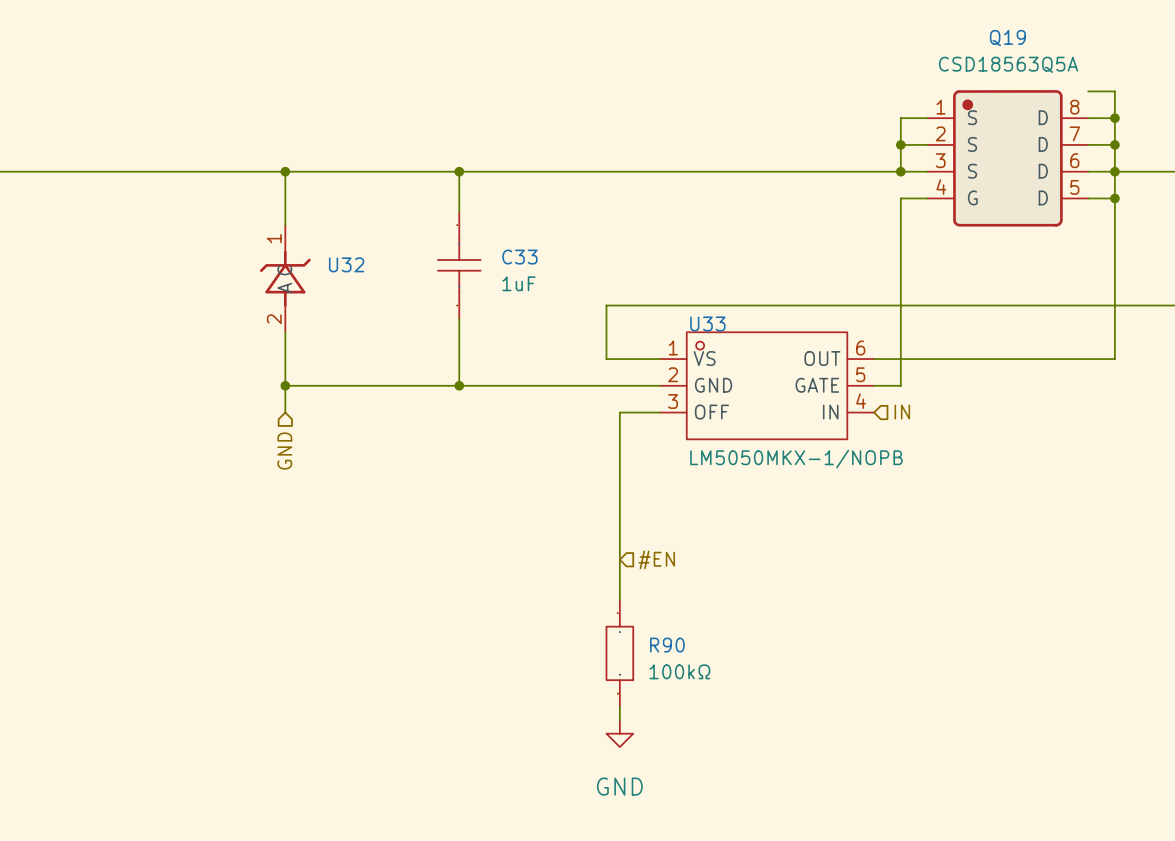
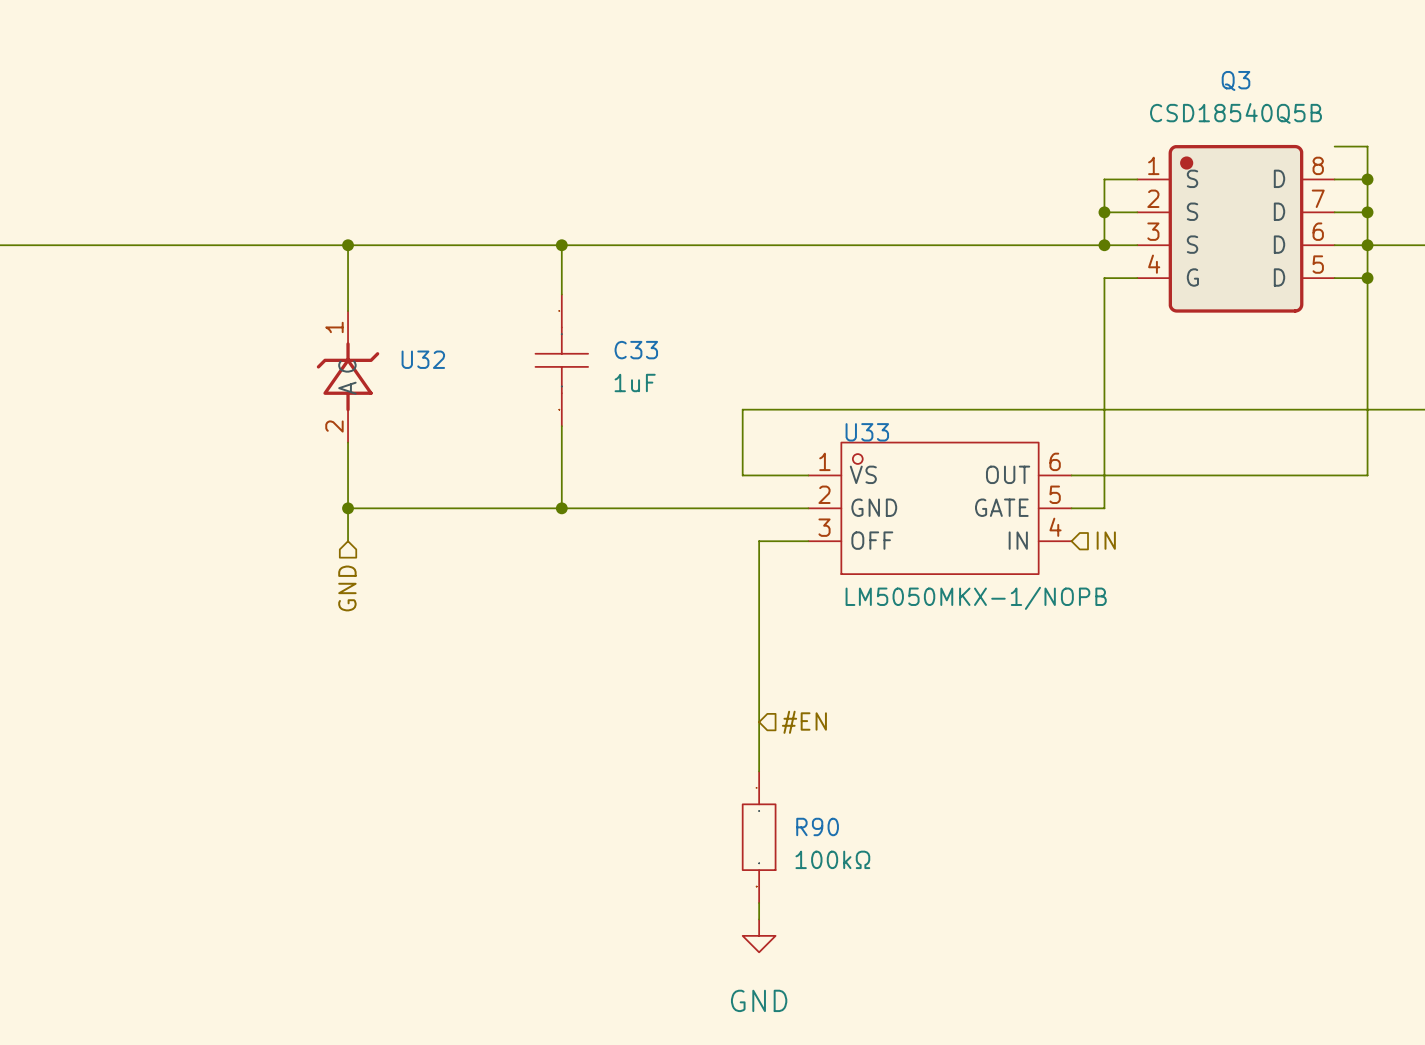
Q19 name: Q19 (1007, 38) -> Q3 (1236, 80)
Q19 value: CSD18563Q5A (1008, 64) -> CSD18540Q5B (1236, 113)

